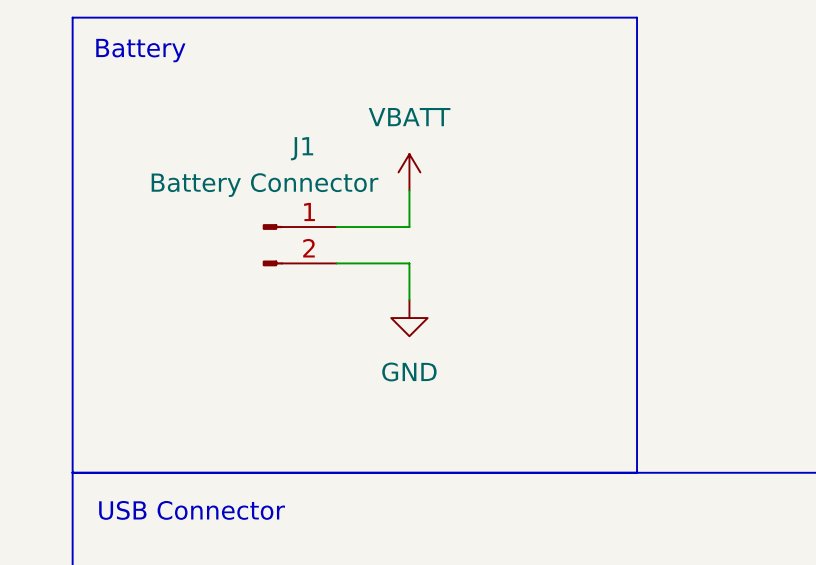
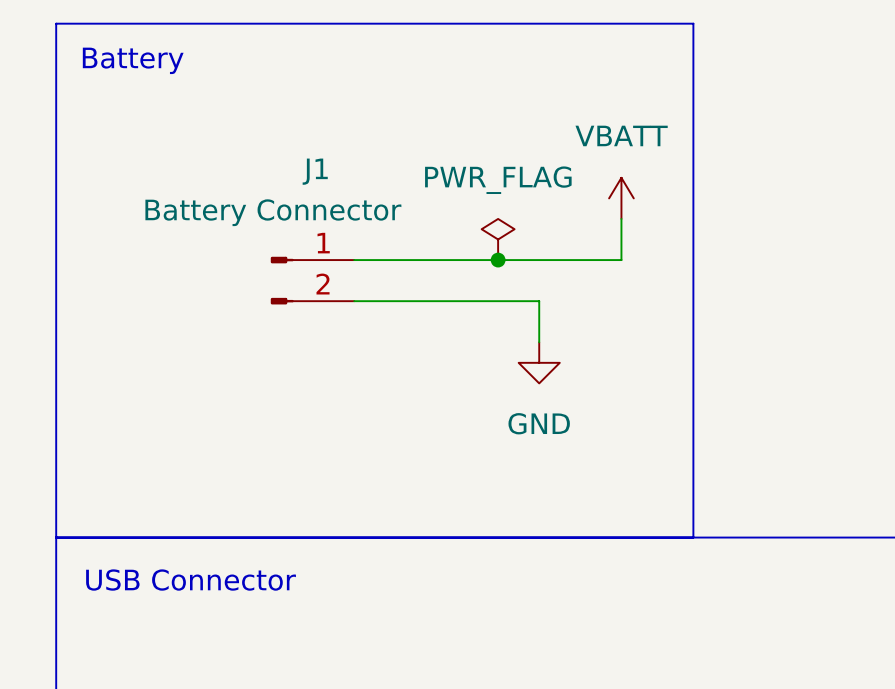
power symbol position: VBATT (409, 172) -> VBATT (621, 198)
wire: (409, 190) (409, 227) -> (621, 218) (621, 260) (436, 260)
power symbol: none -> PWR_FLAG (498, 239)
junction: none -> (498, 260)
wire: (409, 263) (409, 299) -> (436, 301) (539, 301) (539, 342)
power symbol position: GND (409, 318) -> GND (539, 362)

